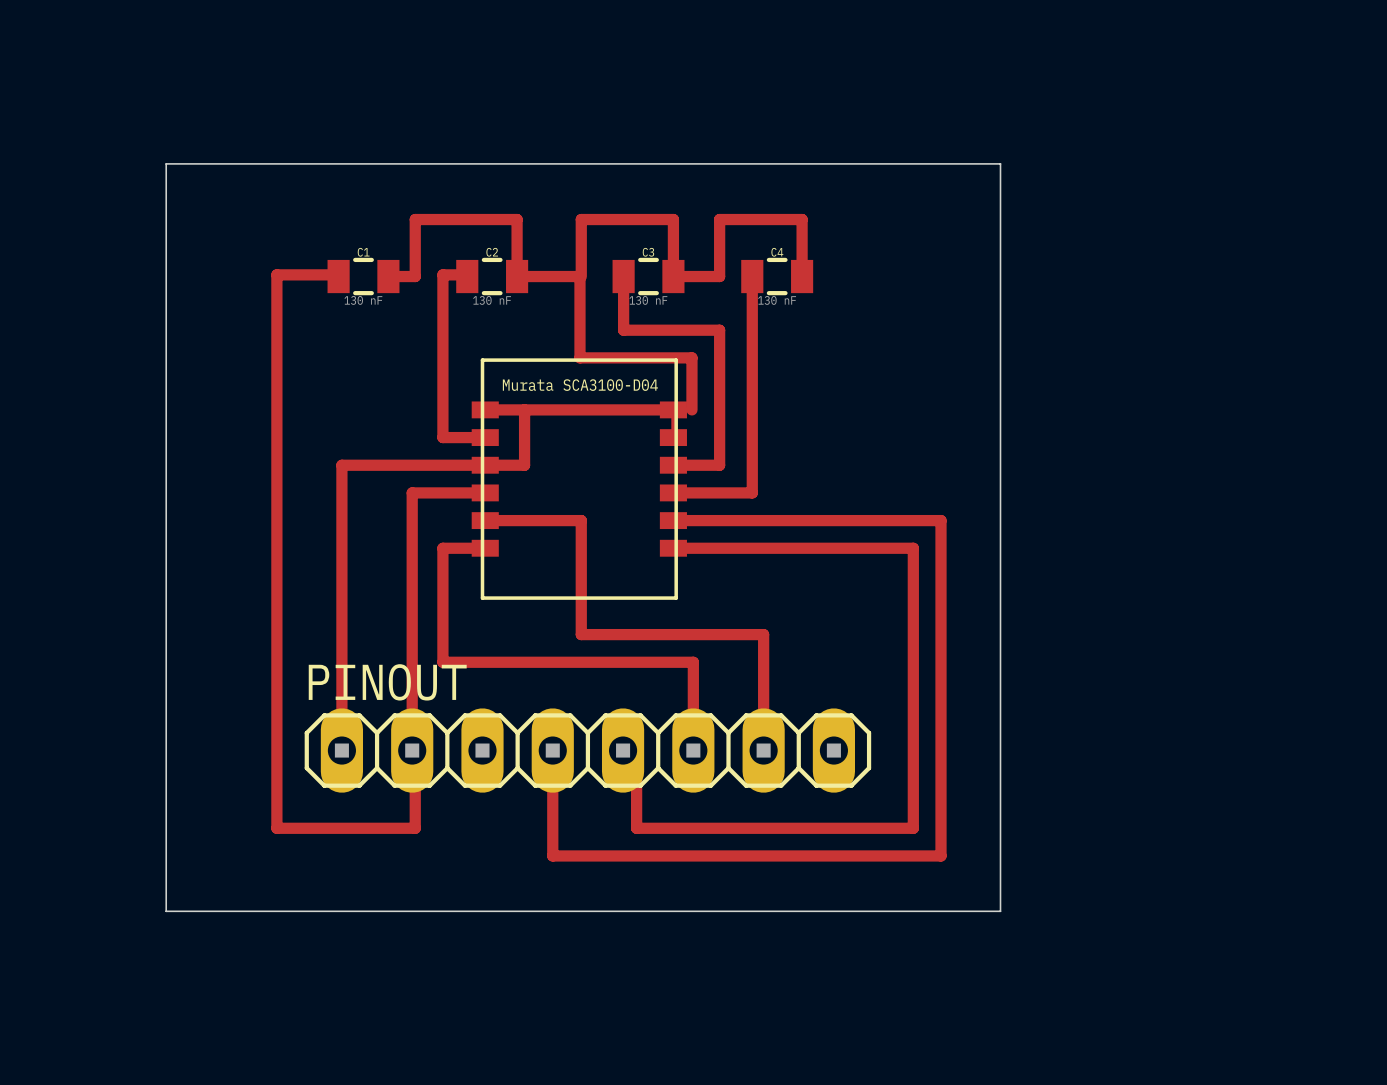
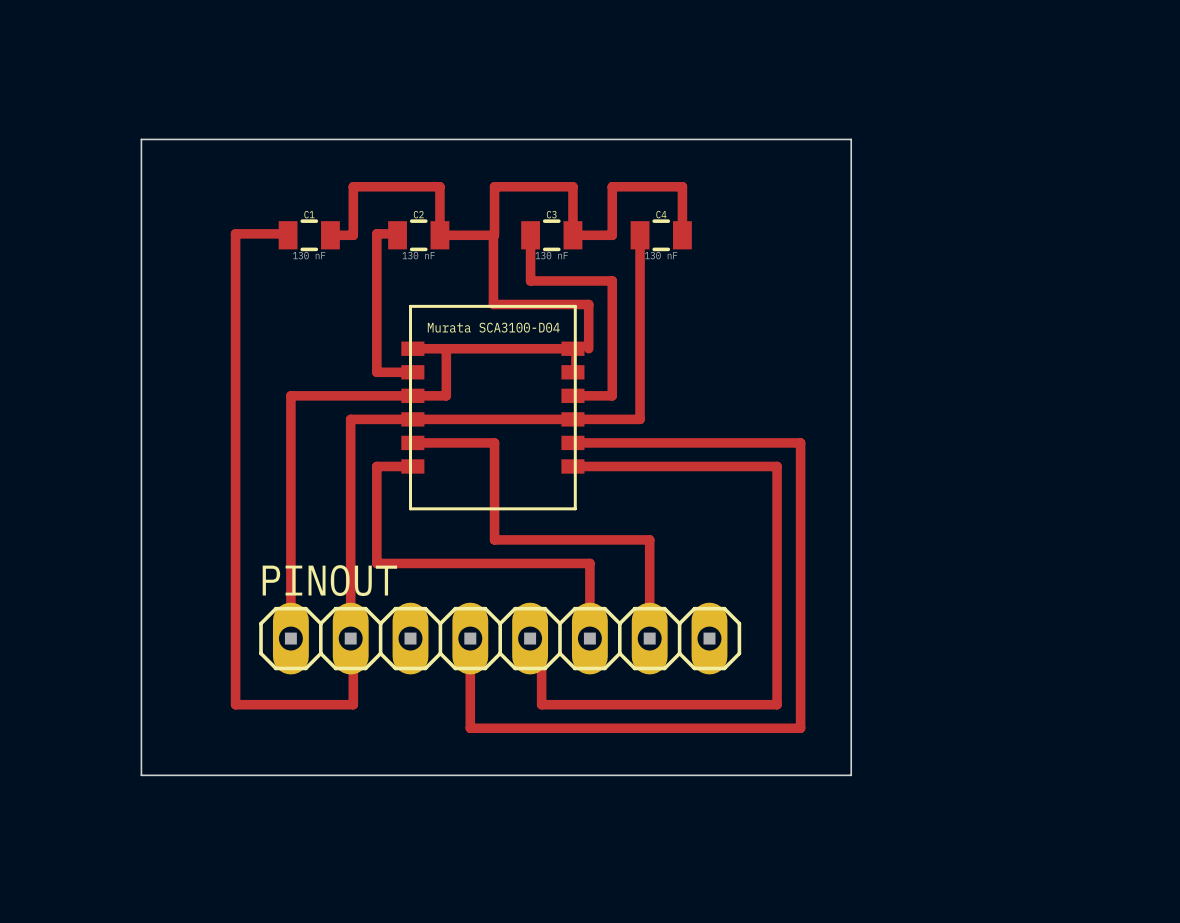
top track: none -> (412, 419) (572, 419)

